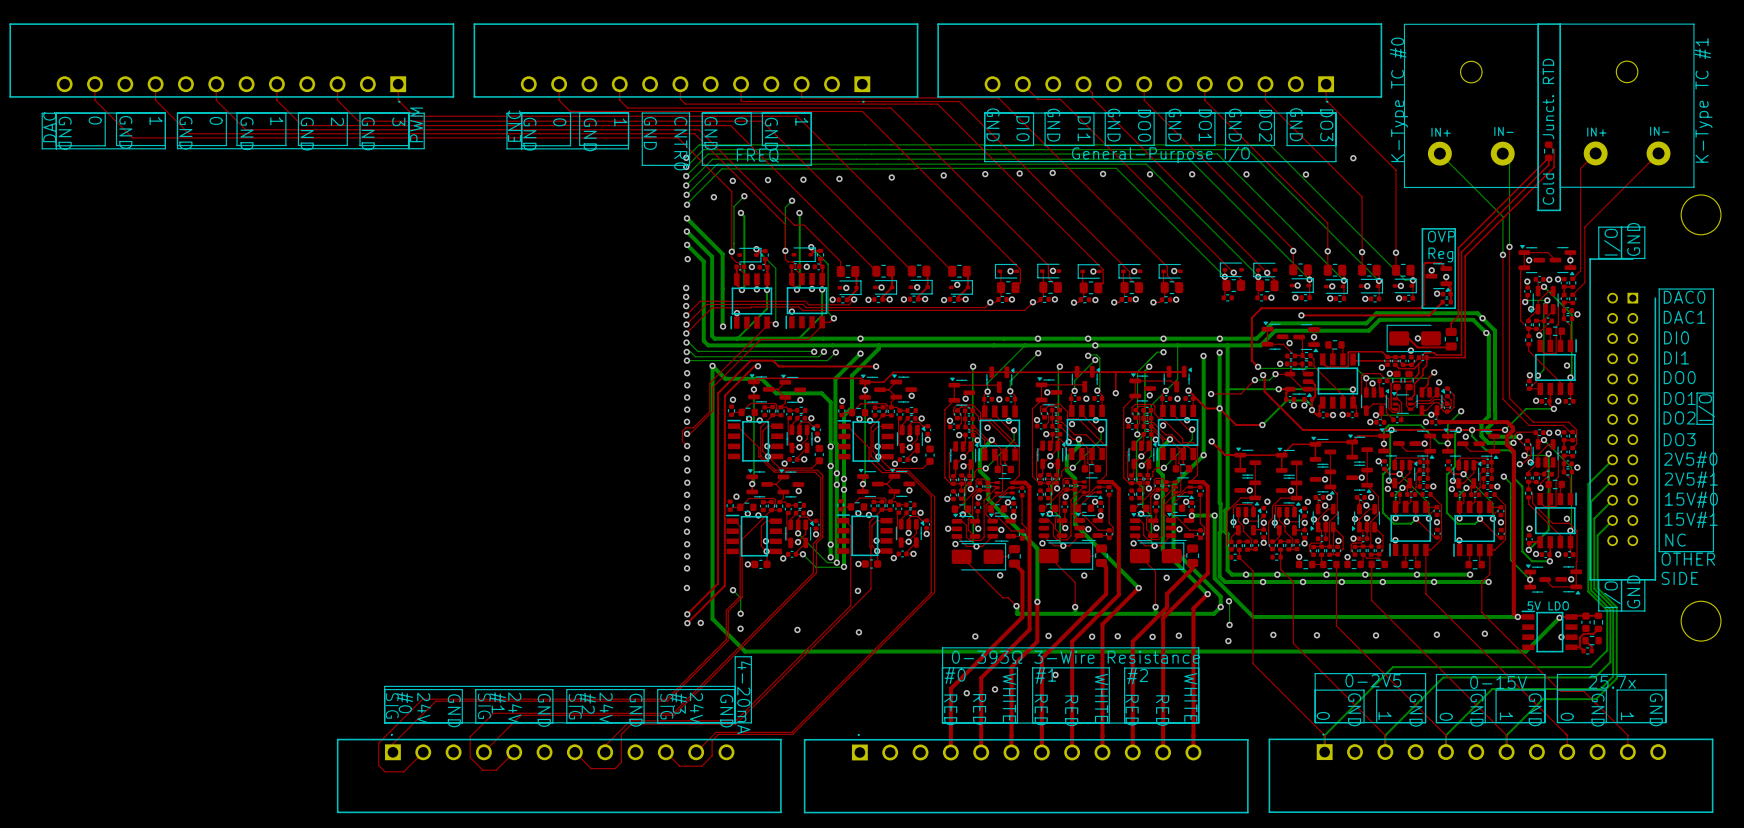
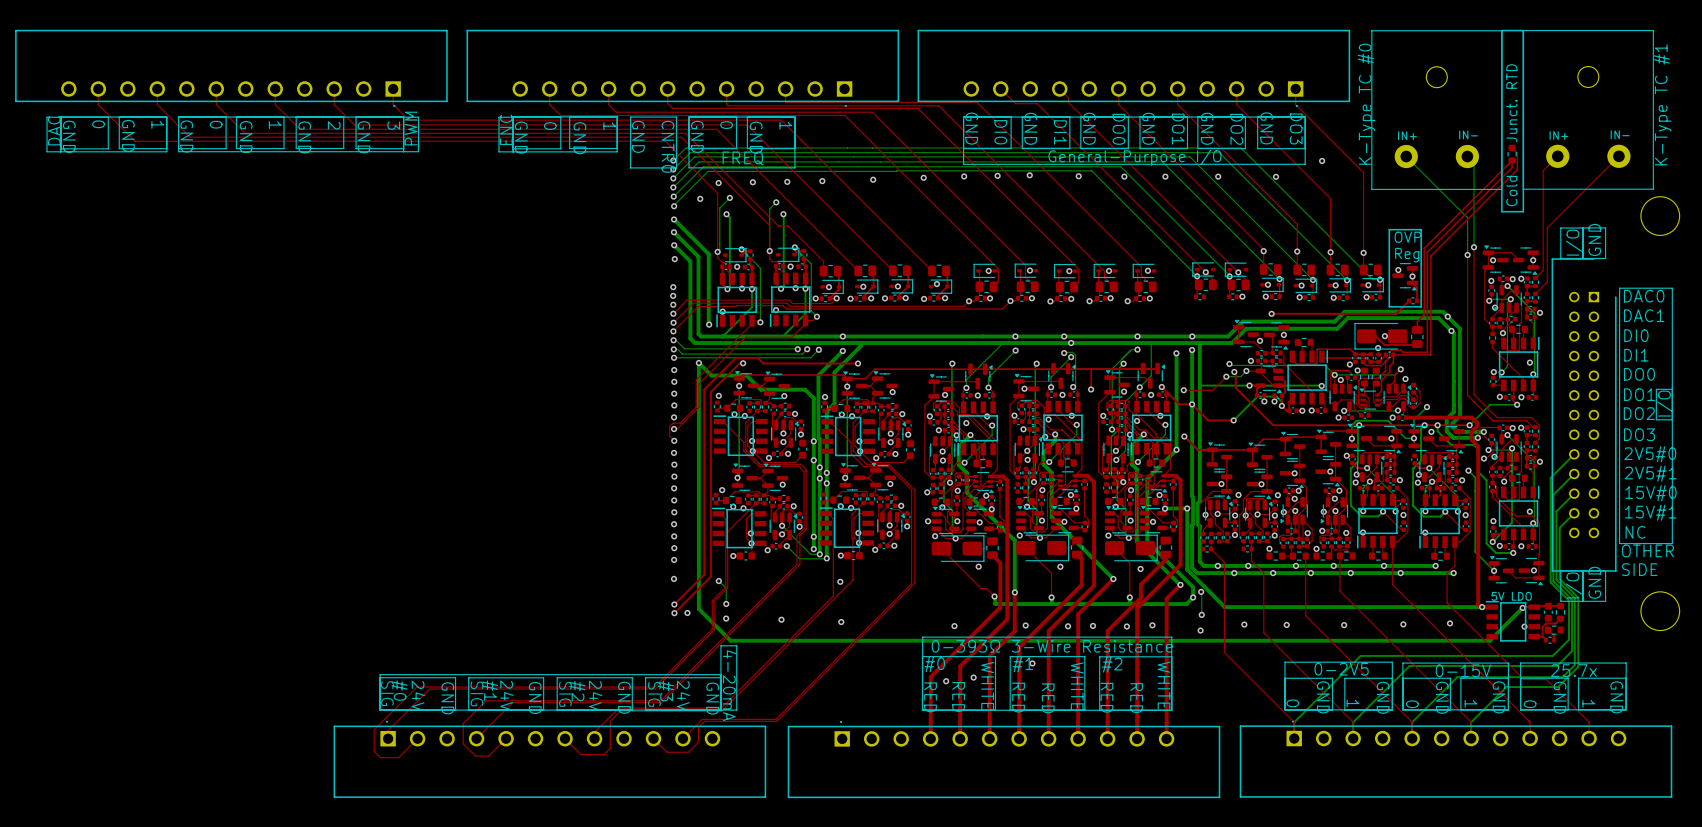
top track: (1446, 268) (1440, 262) (1425, 262) (1423, 264) (1423, 304) (1420, 308) (1261, 308) (1251, 317) (1251, 360) (1258, 366) -> (1412, 268) (1412, 276)
via: (1437, 293) -> none
part: (1446, 294) -> none

